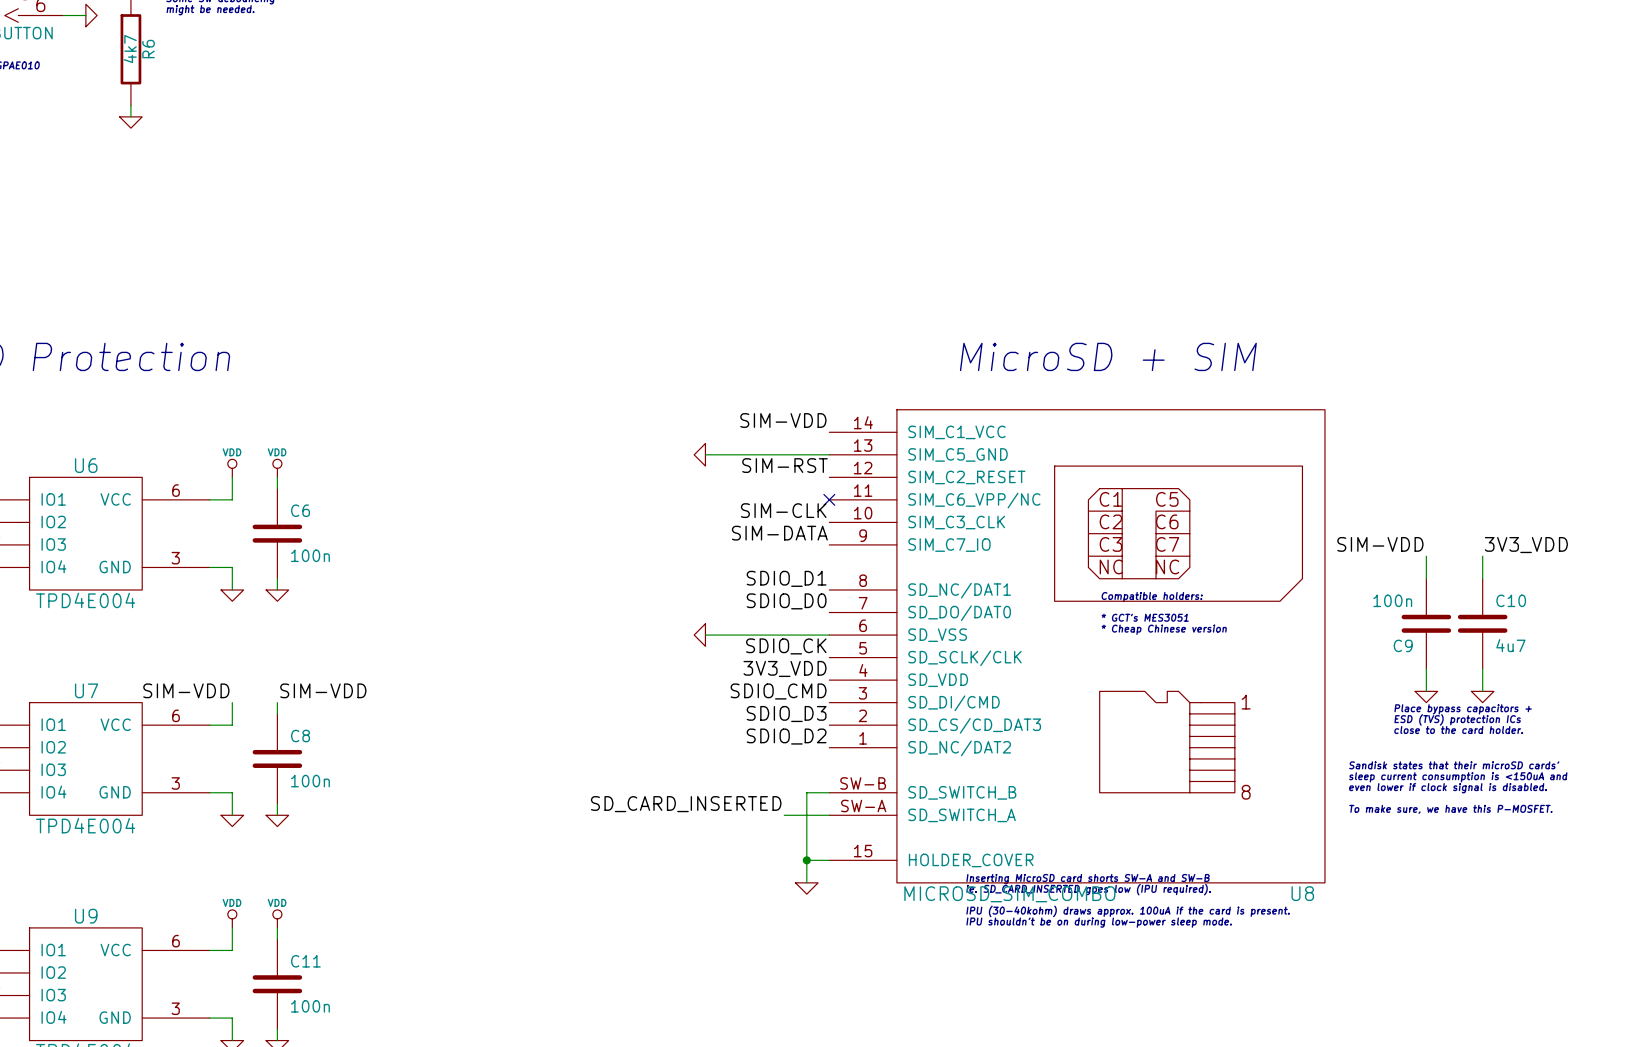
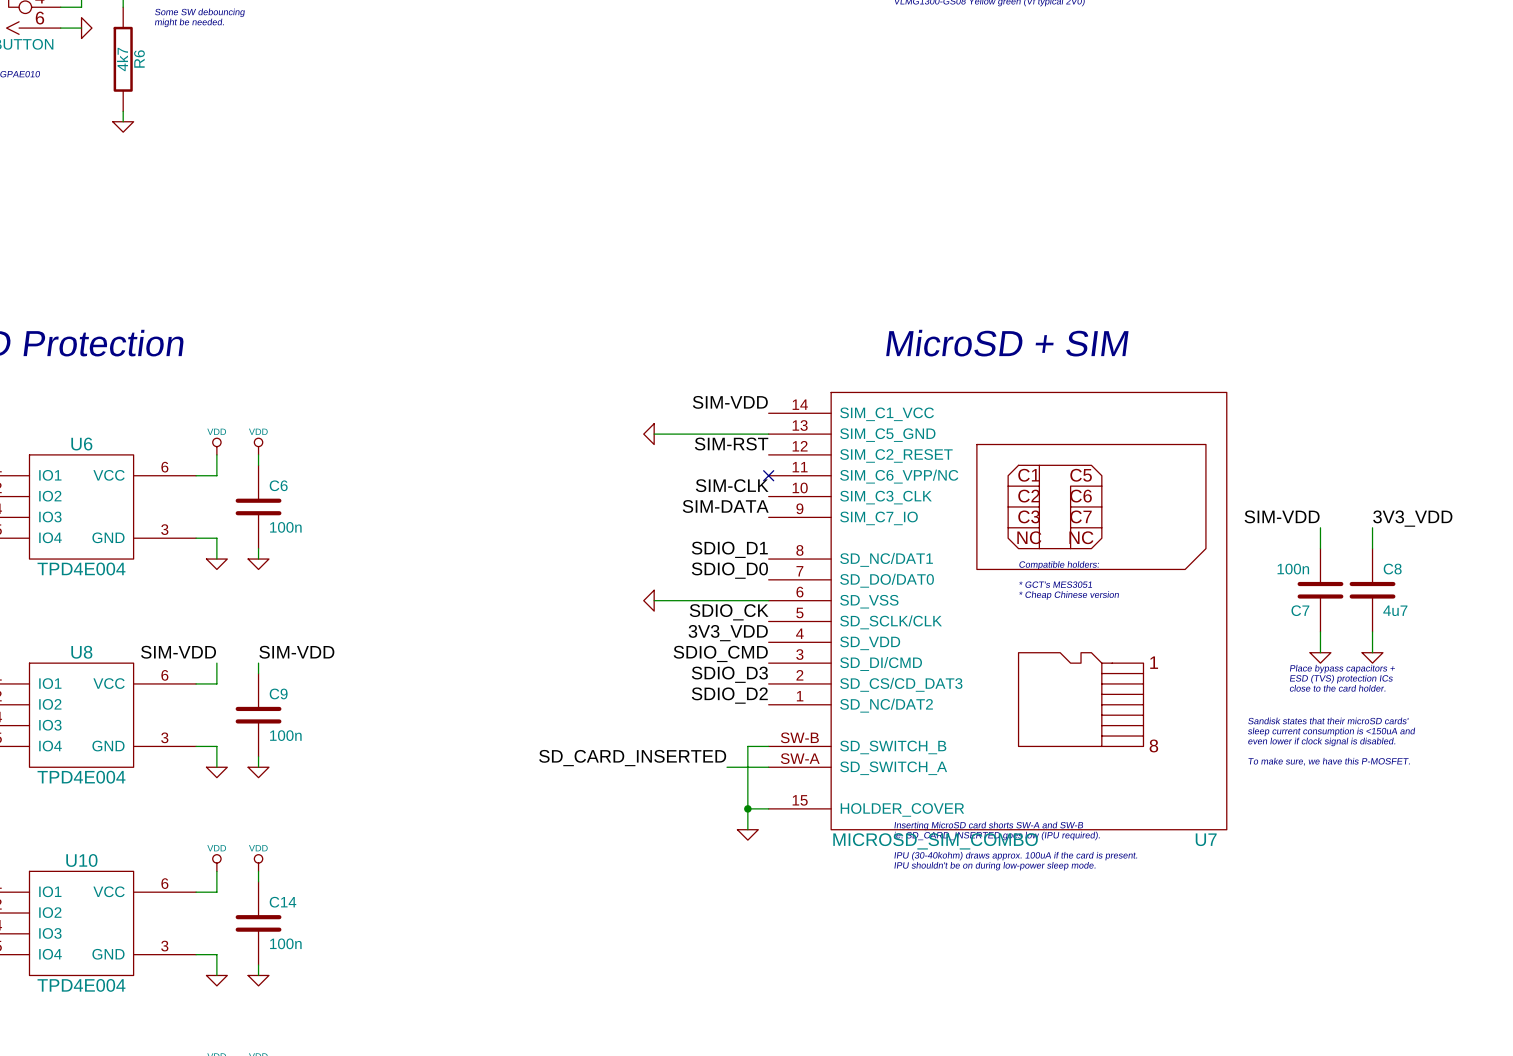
C10 name: C10 (1511, 600) -> C8 (1392, 569)
C9 name: C9 (1403, 645) -> C7 (1300, 610)
U7 name: U7 (86, 690) -> U8 (81, 652)
C8 name: C8 (300, 736) -> C9 (278, 693)
U8 name: U8 (1302, 893) -> U7 (1206, 839)
U9 name: U9 (86, 916) -> U10 (81, 860)
C11 name: C11 (305, 961) -> C14 (282, 902)

